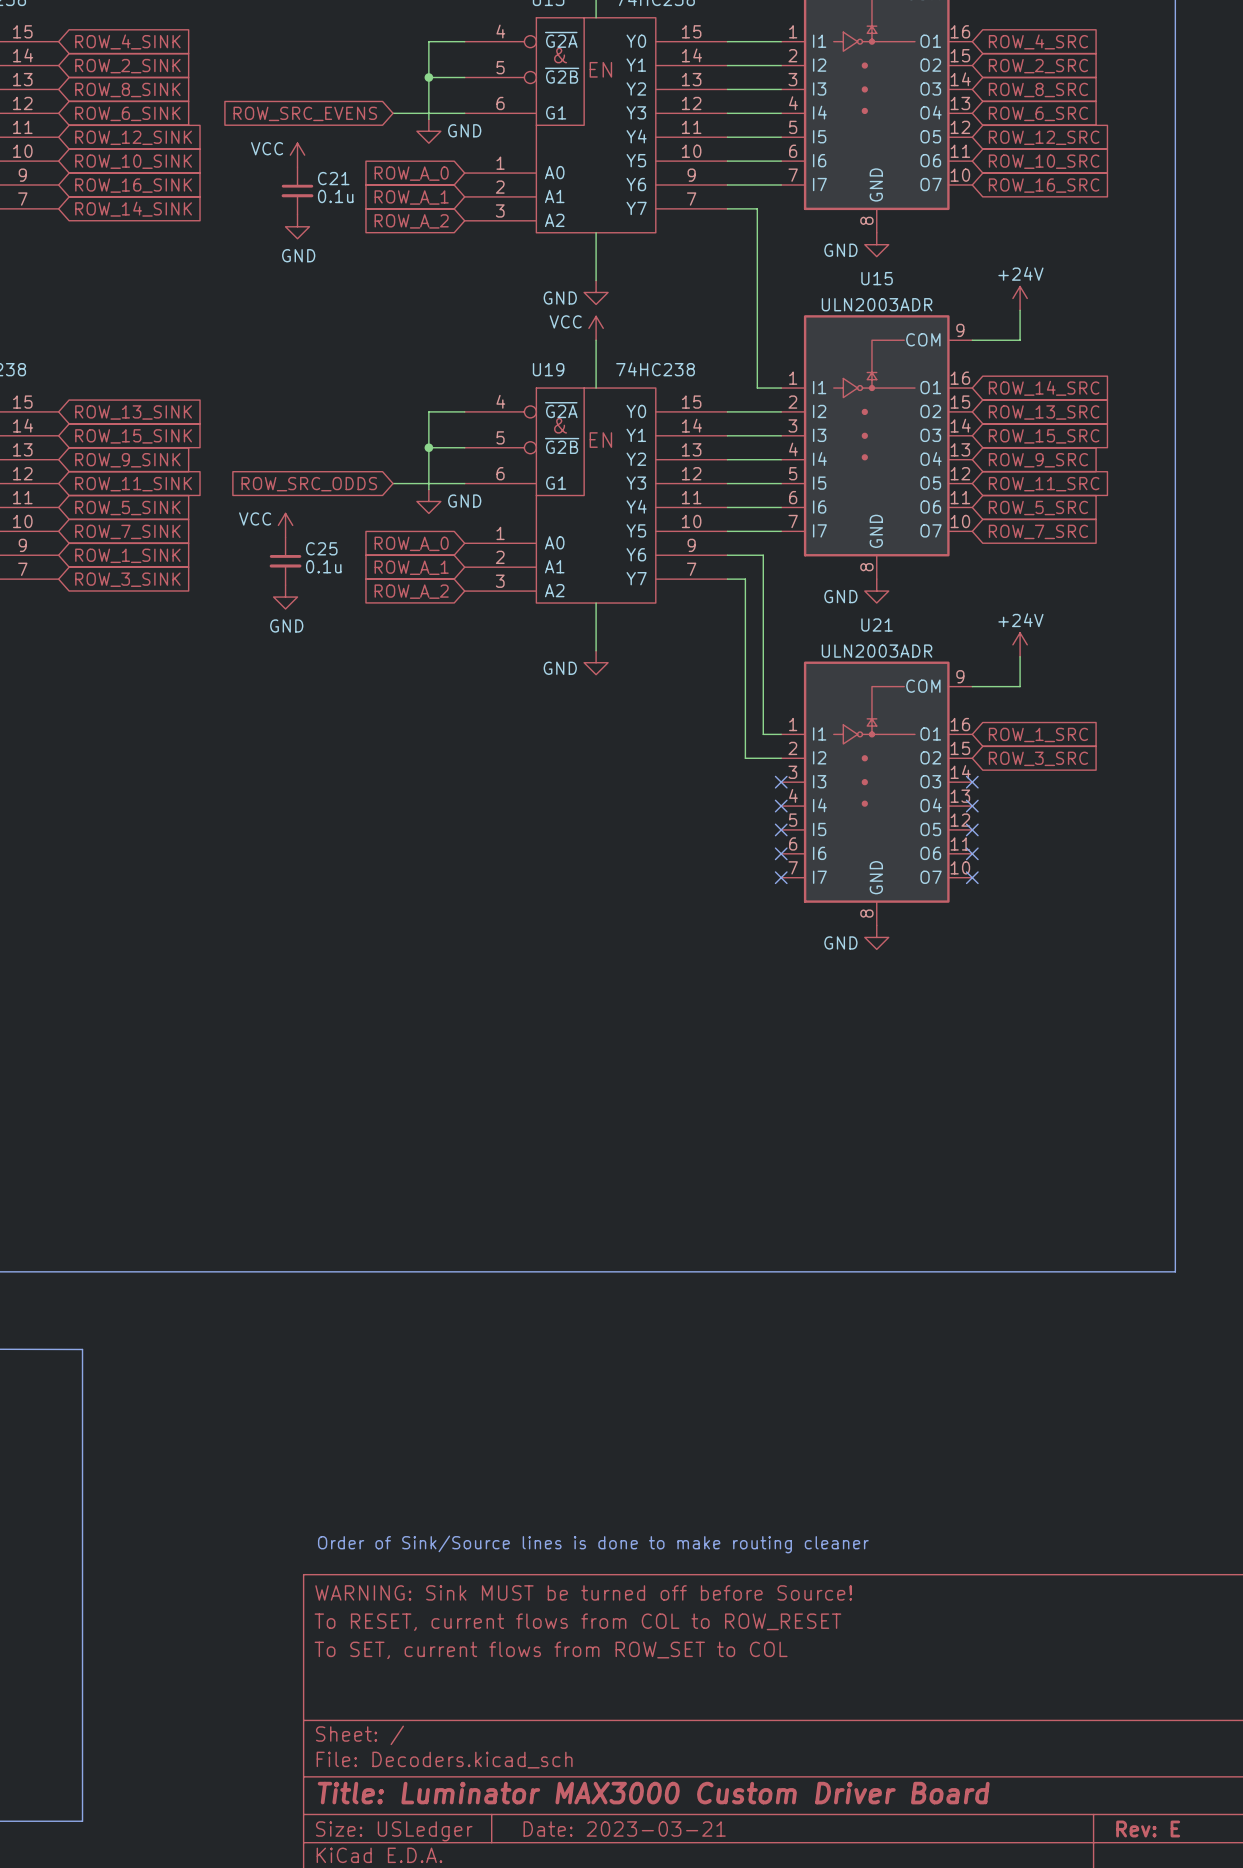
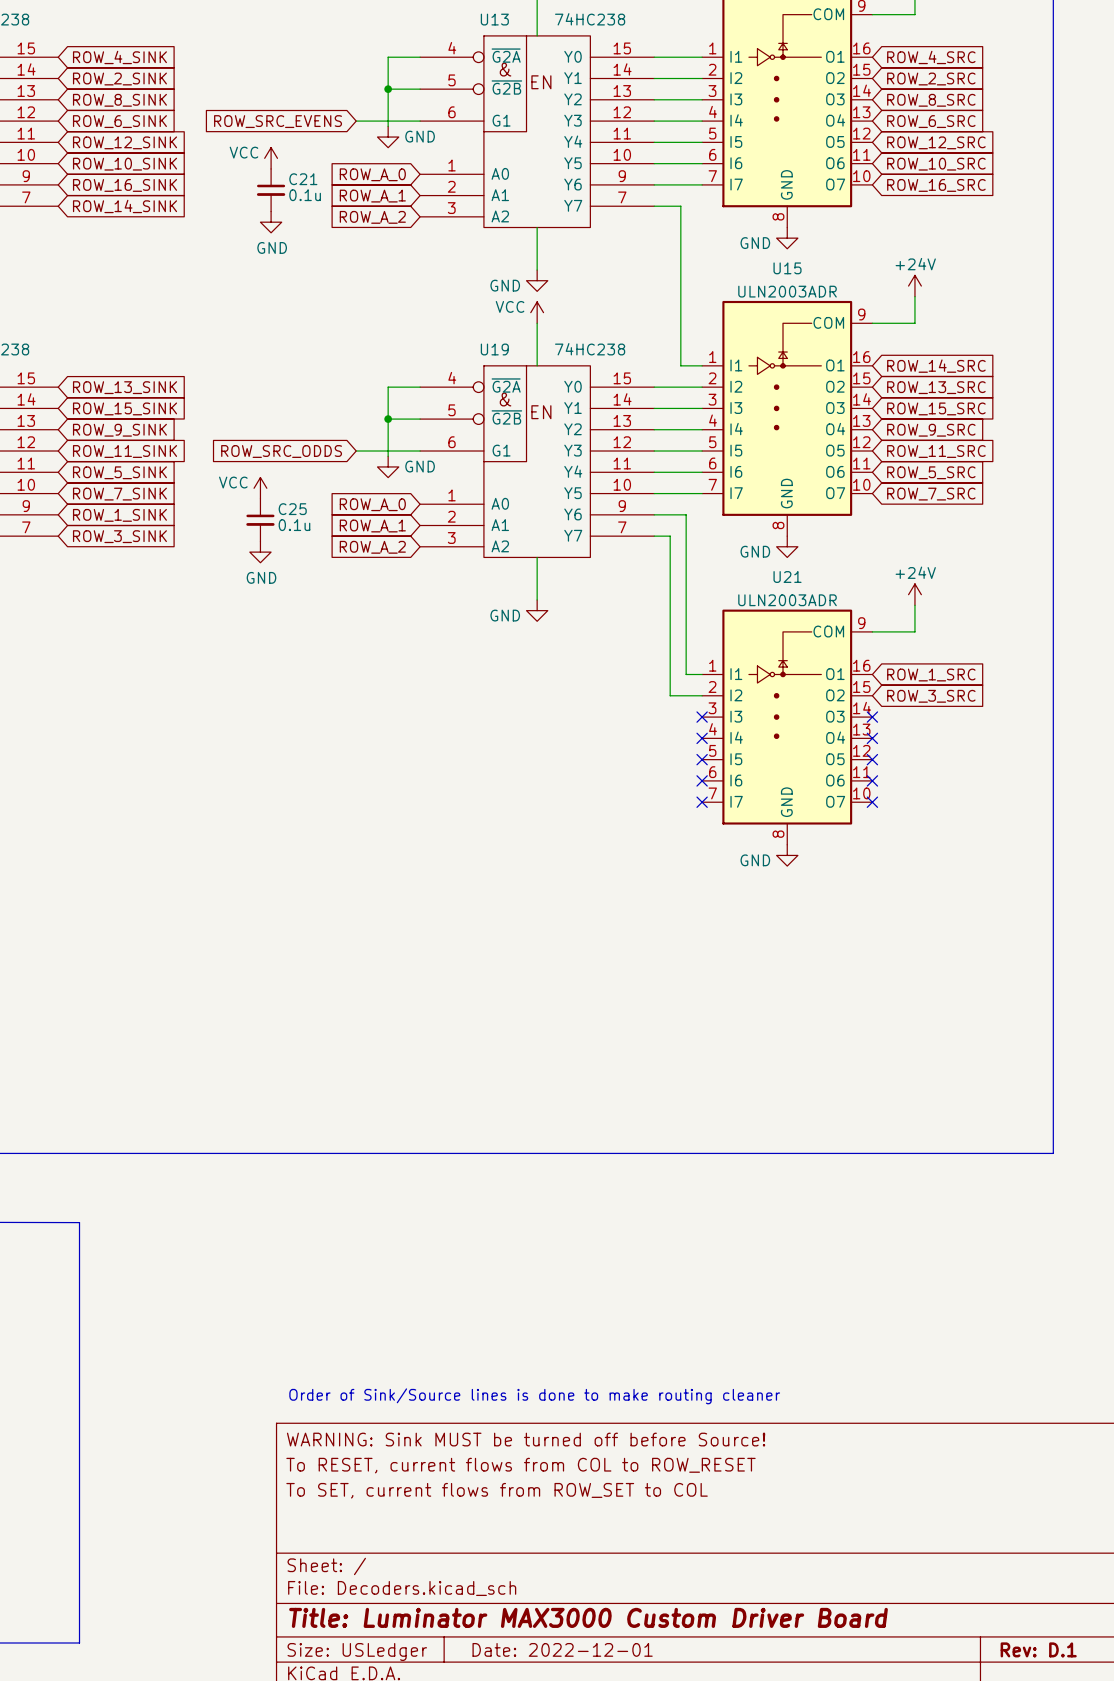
title block: Date: 2023-03-21 (624, 1828) -> Date: 2022-12-01 (562, 1649)
title block: Rev: E (1148, 1828) -> Rev: D.1 (1038, 1649)

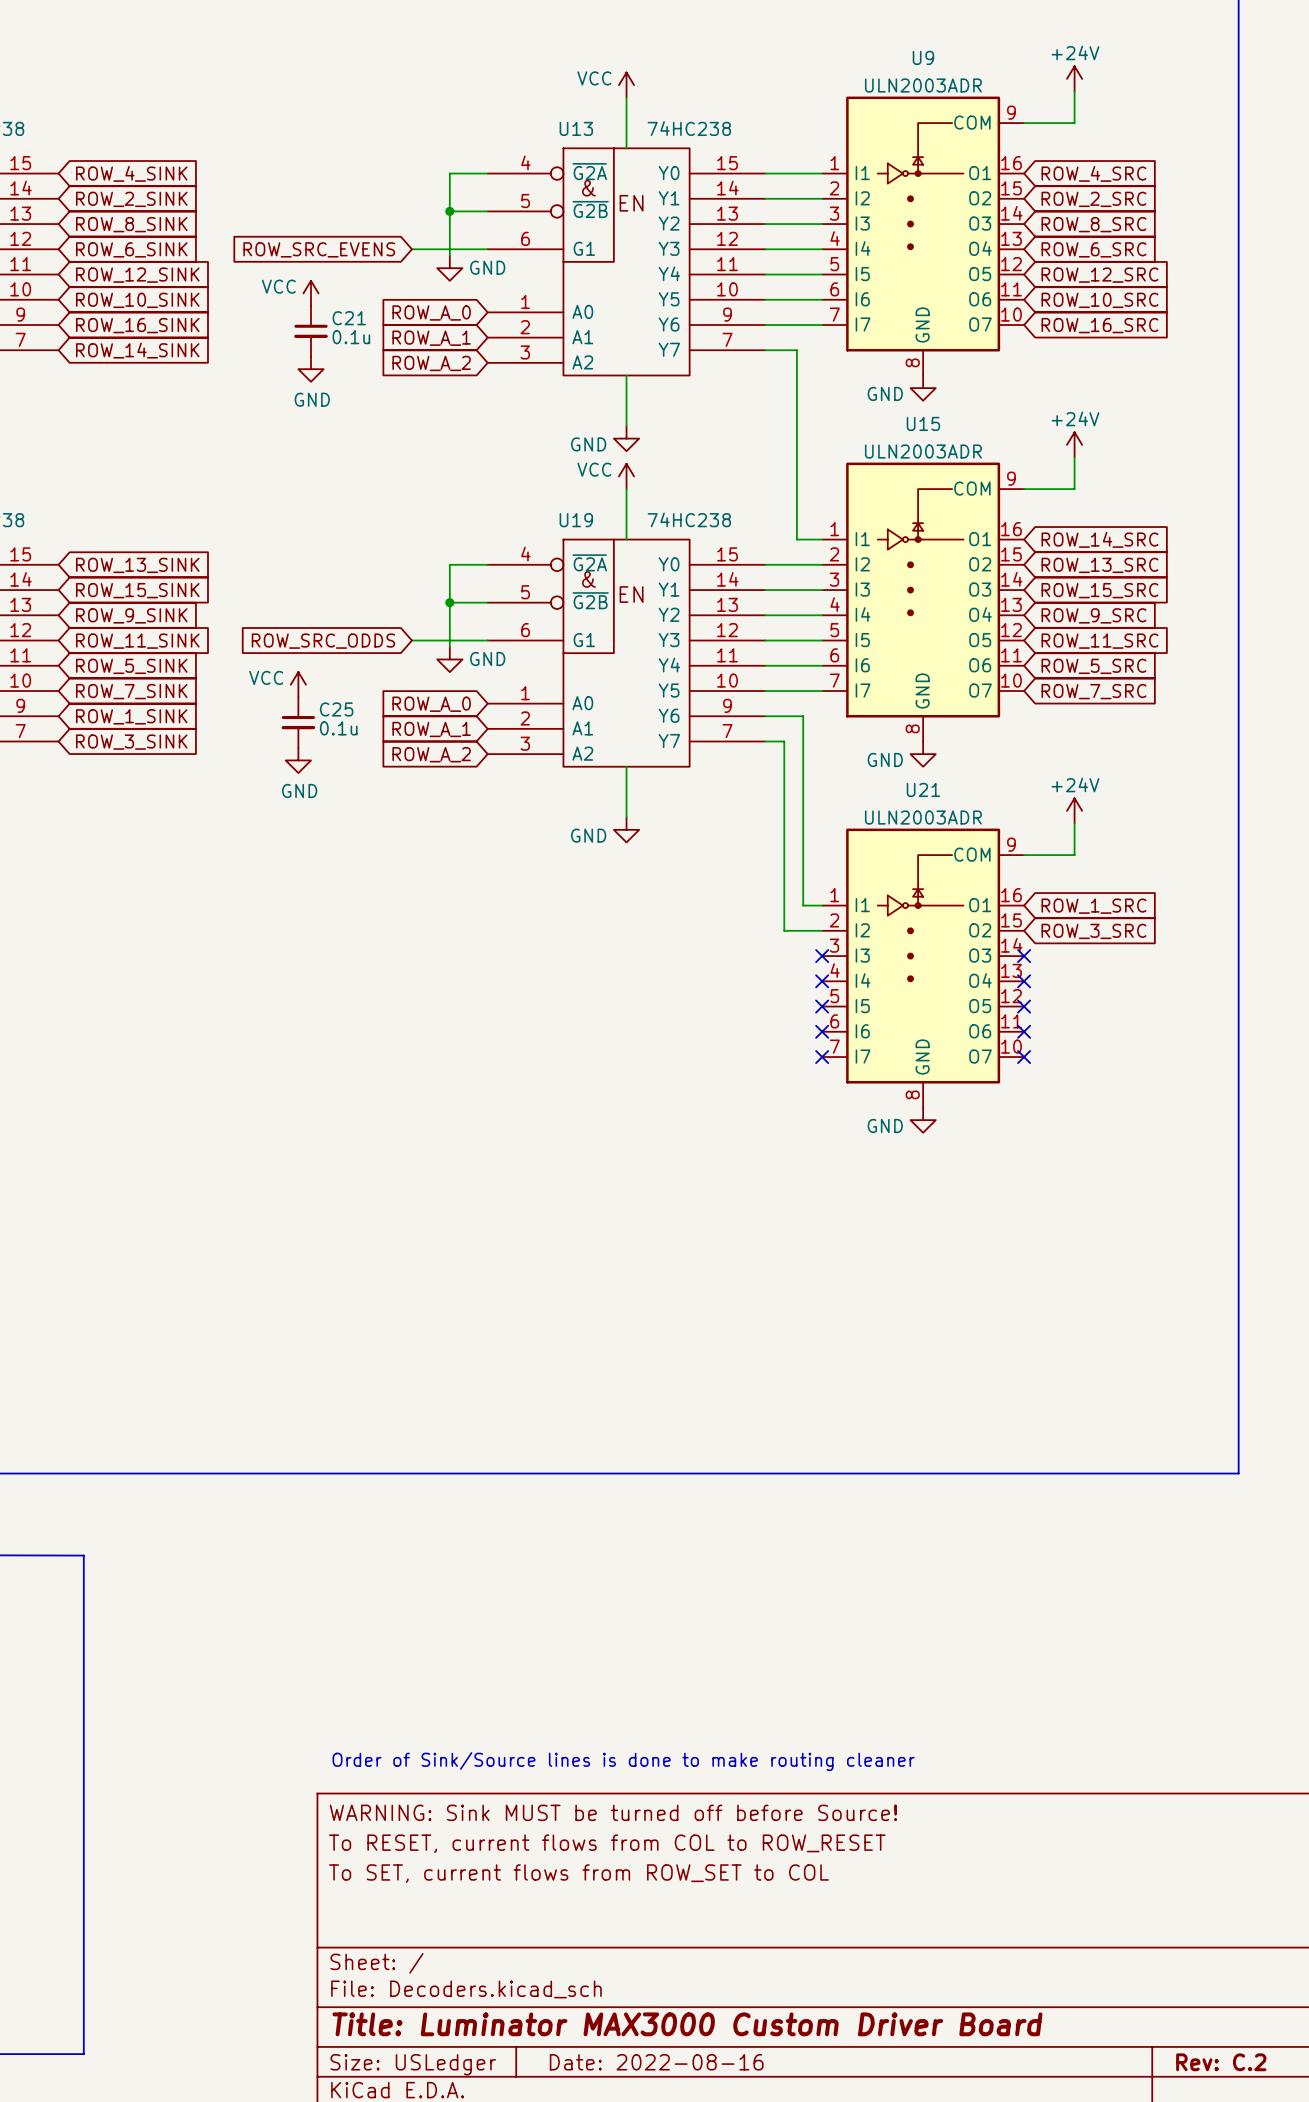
title block: Date: 2022-12-01 (562, 1649) -> Date: 2022-08-16 (656, 2062)
title block: Rev: D.1 (1038, 1649) -> Rev: C.2 (1221, 2062)

